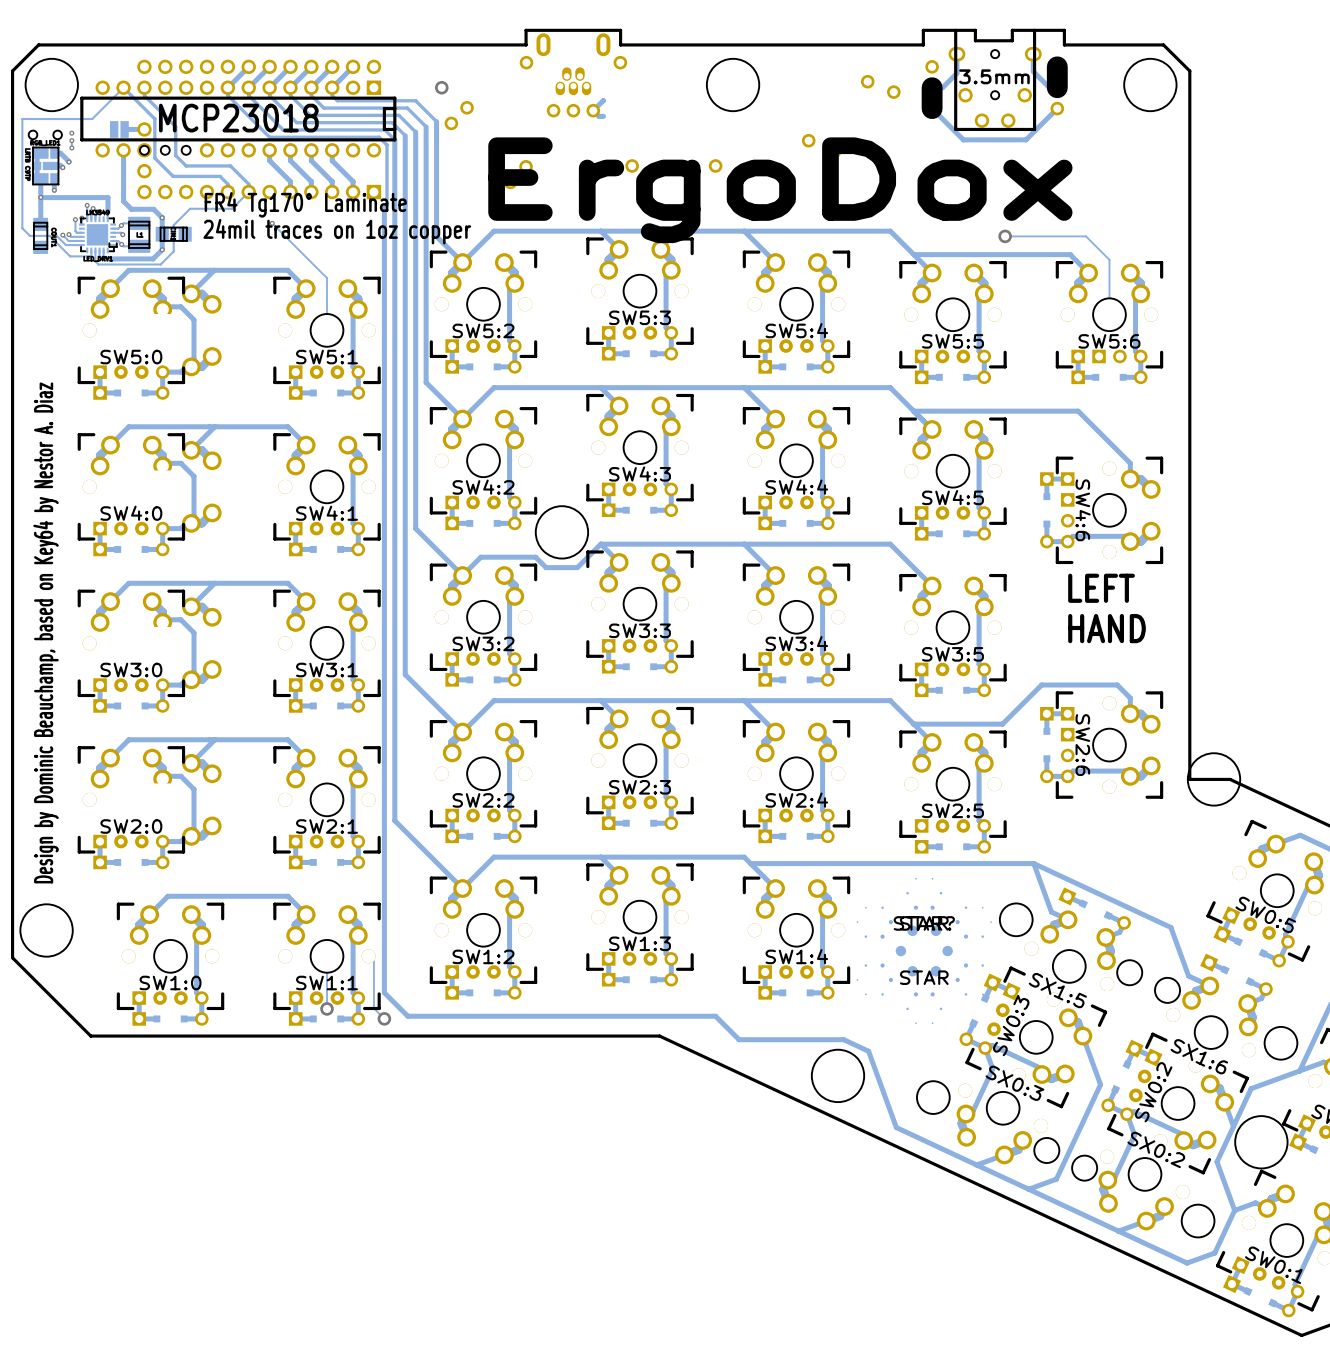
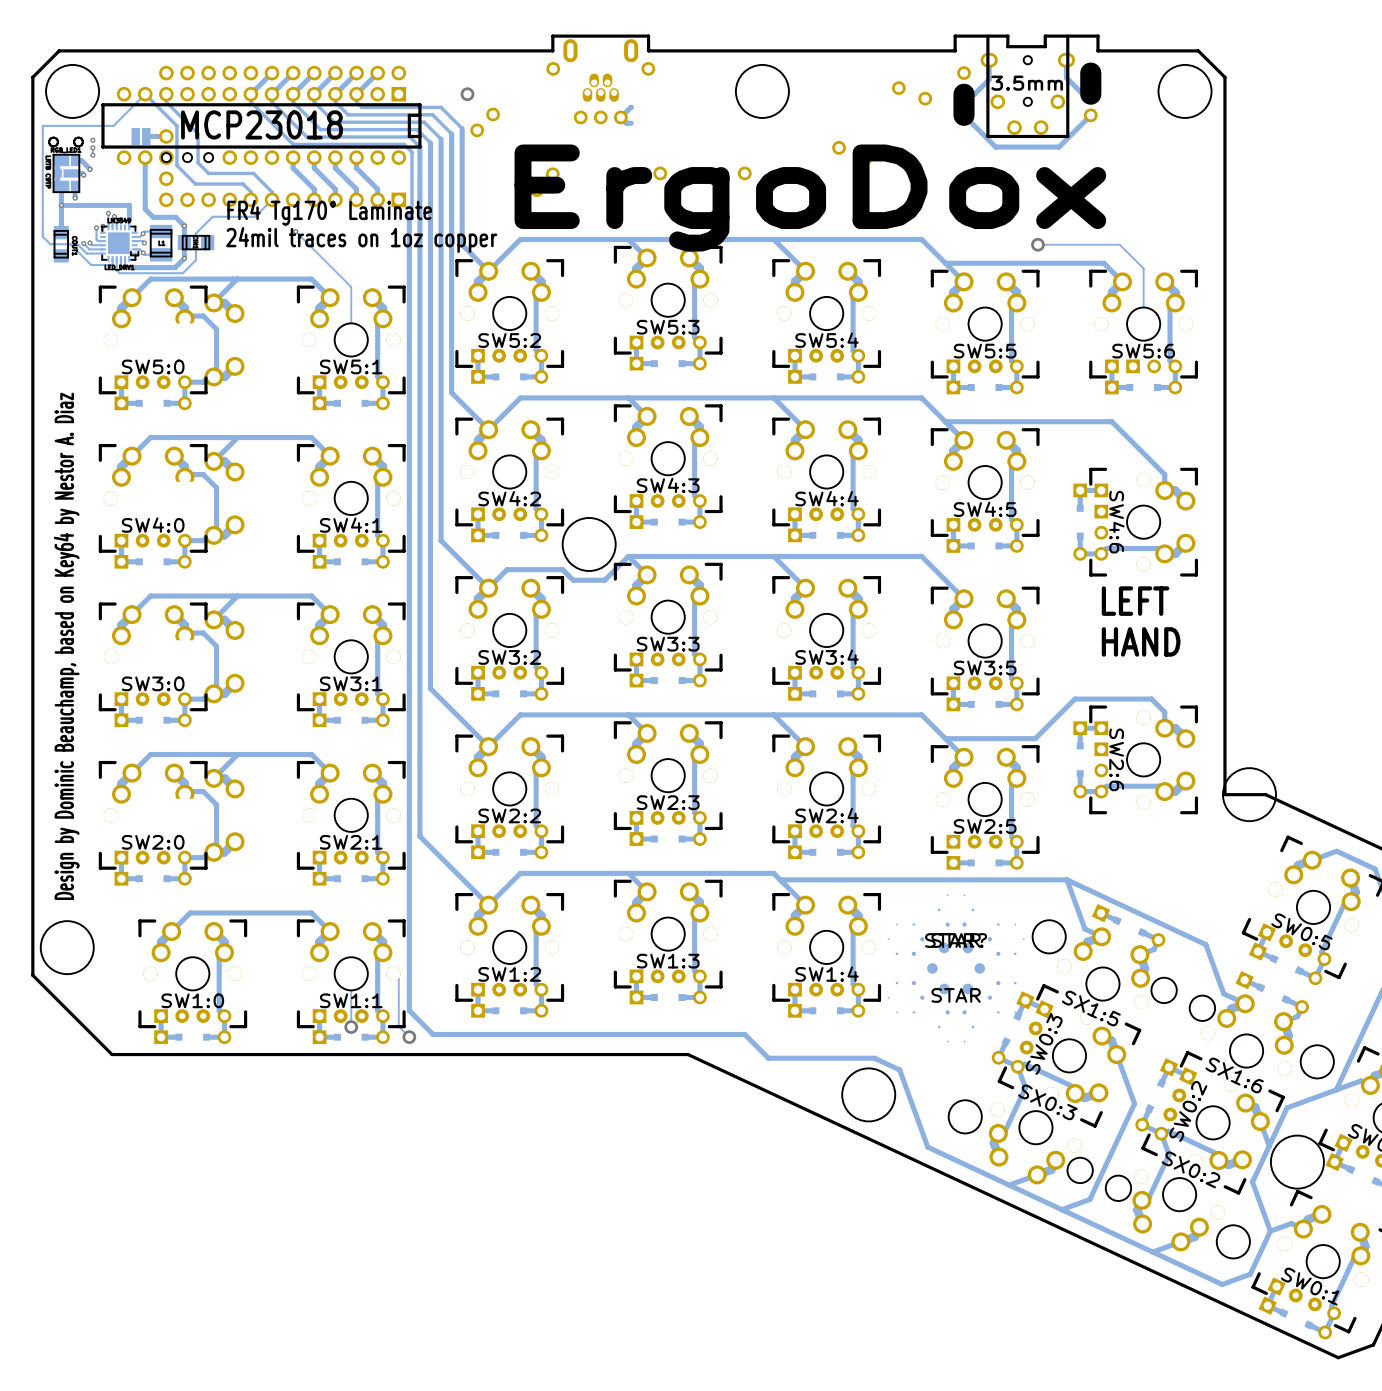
part: none -> (66, 142)

